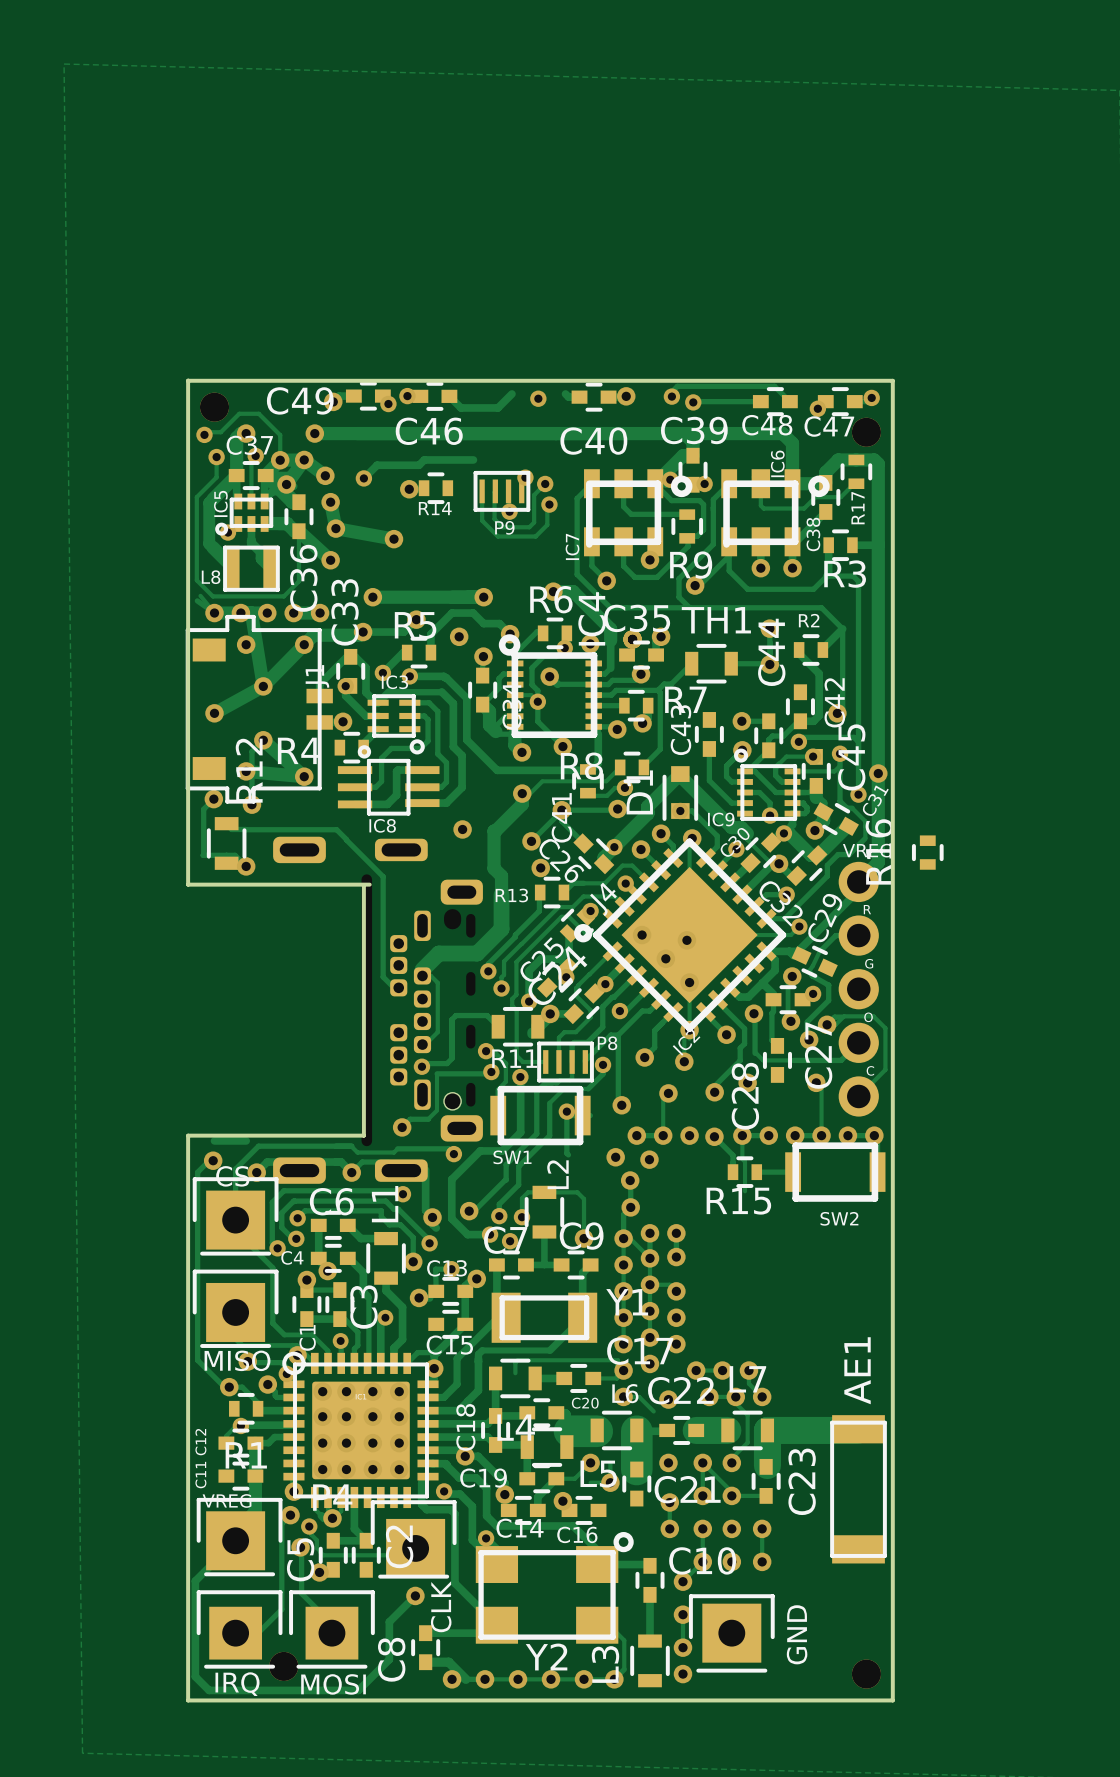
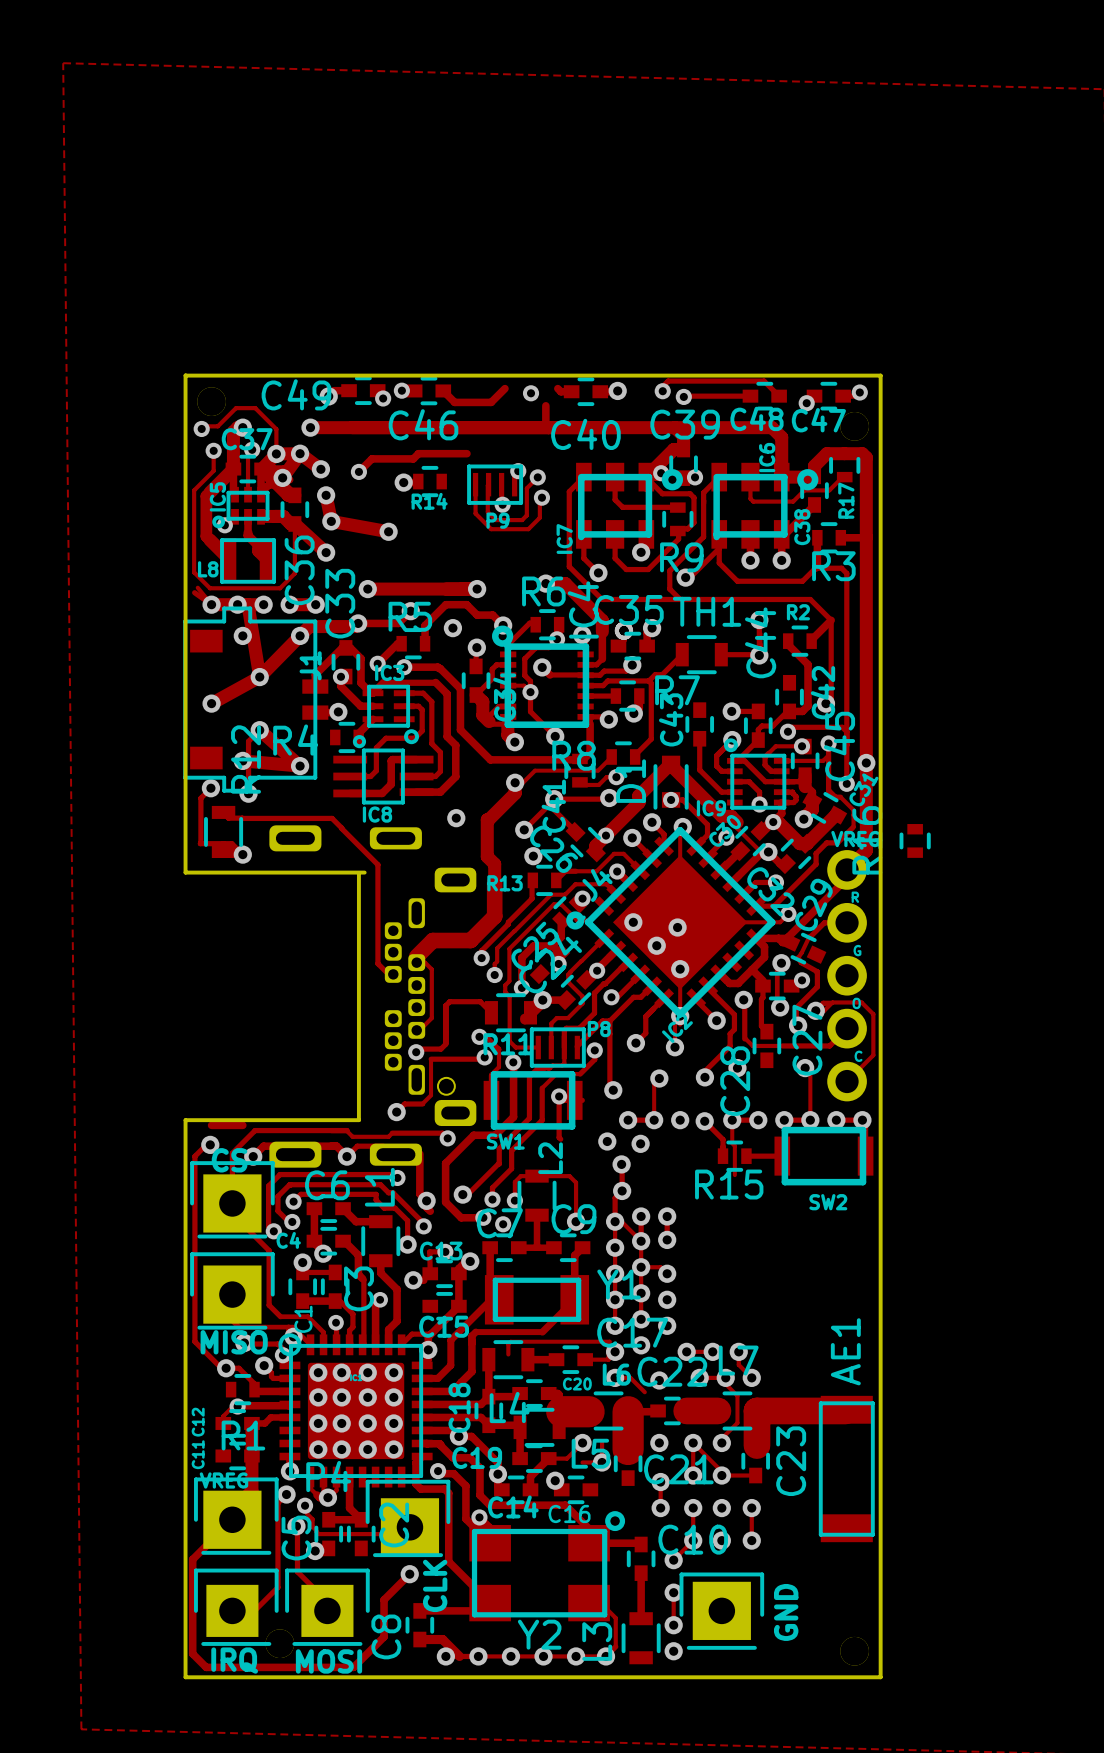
track: none -> (545, 405) (545, 425)

